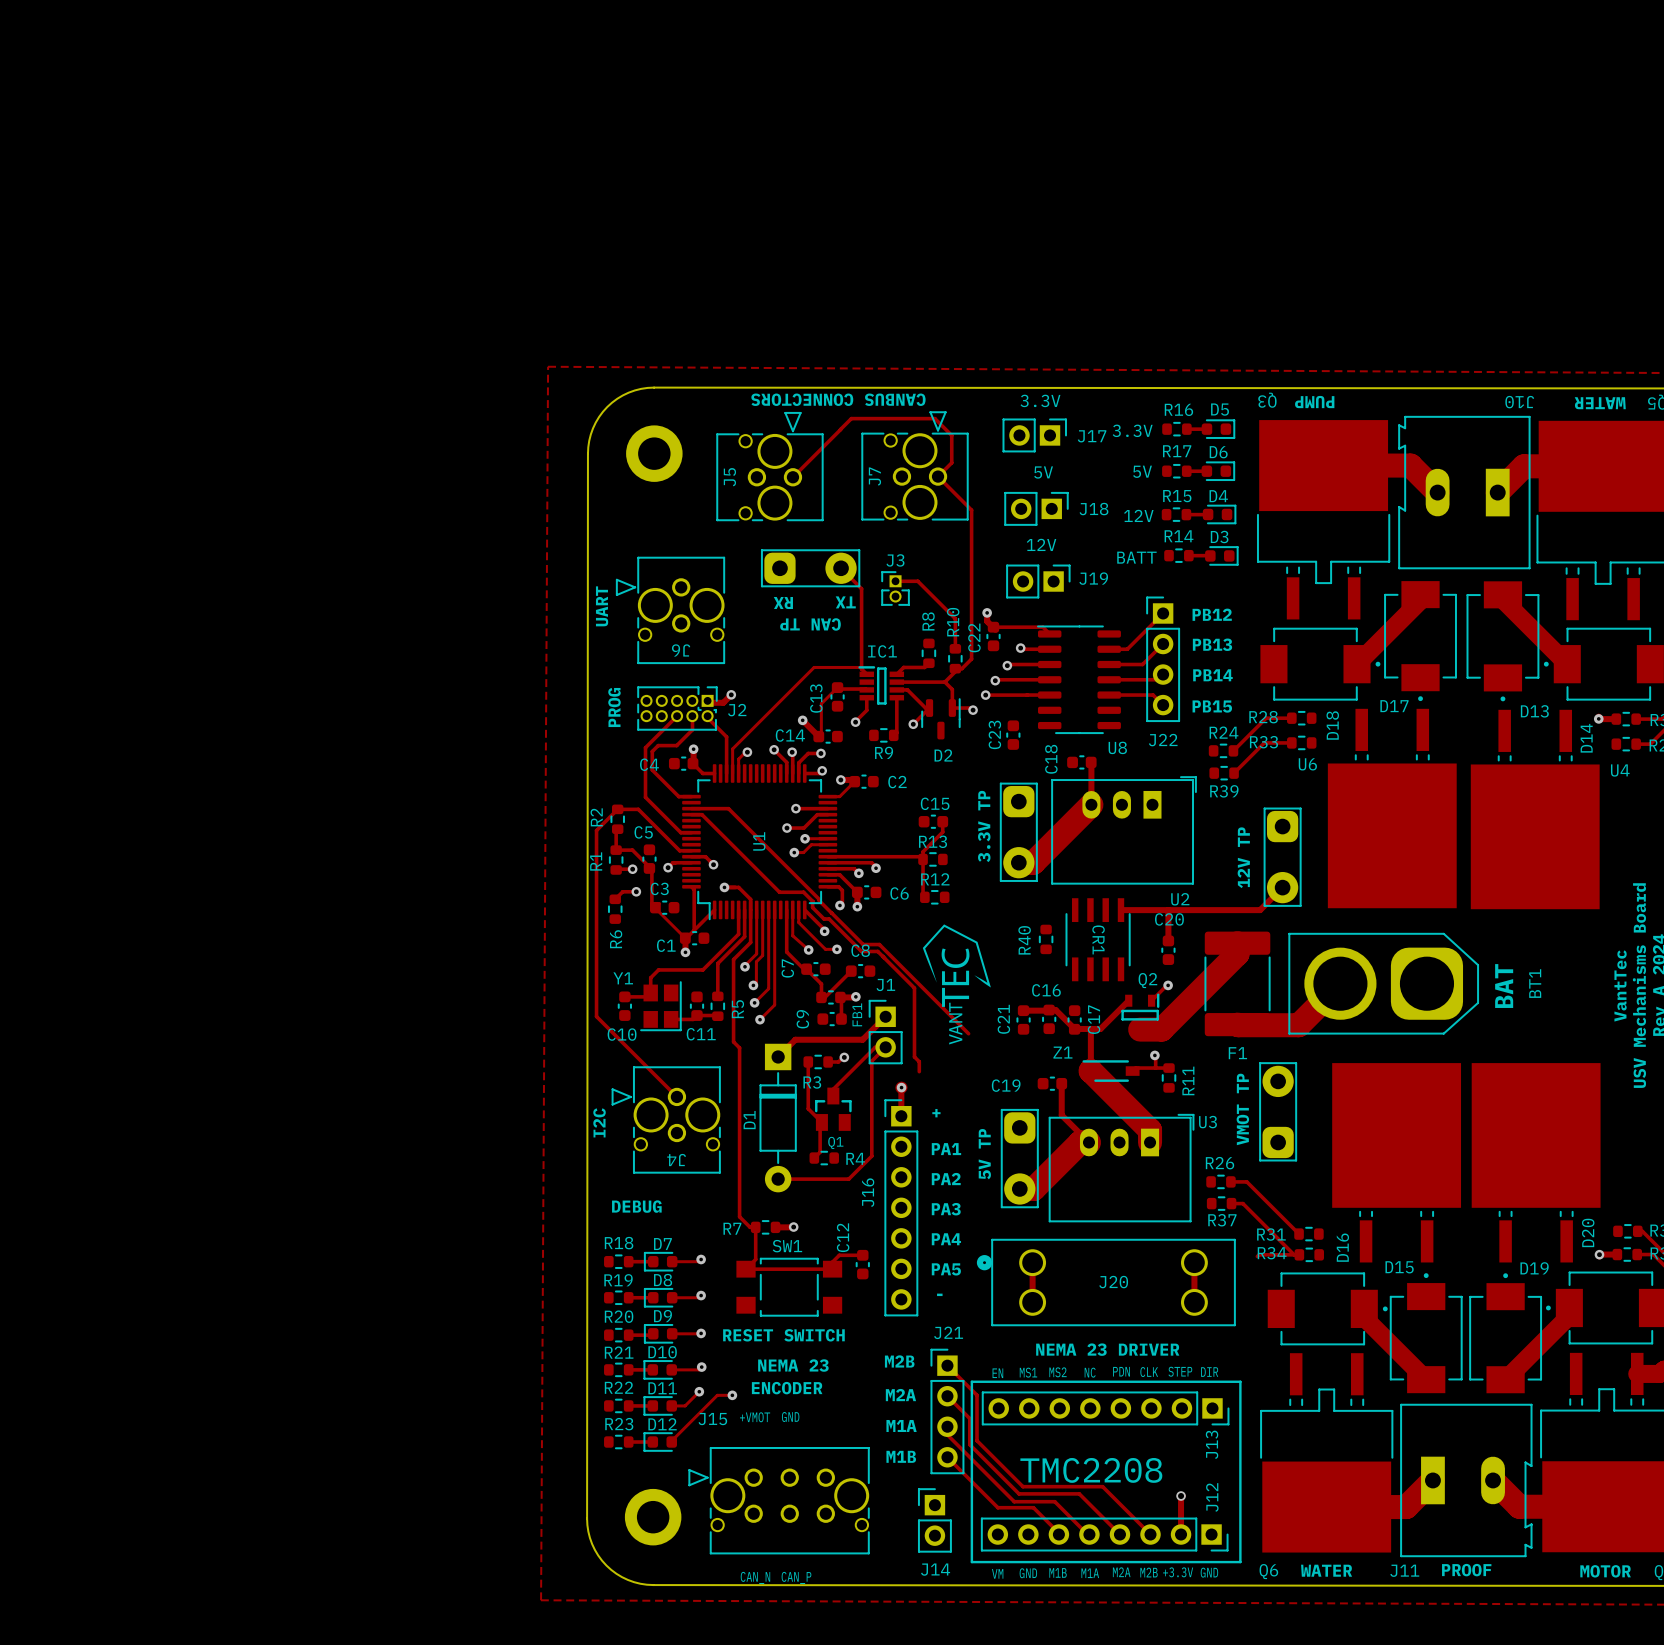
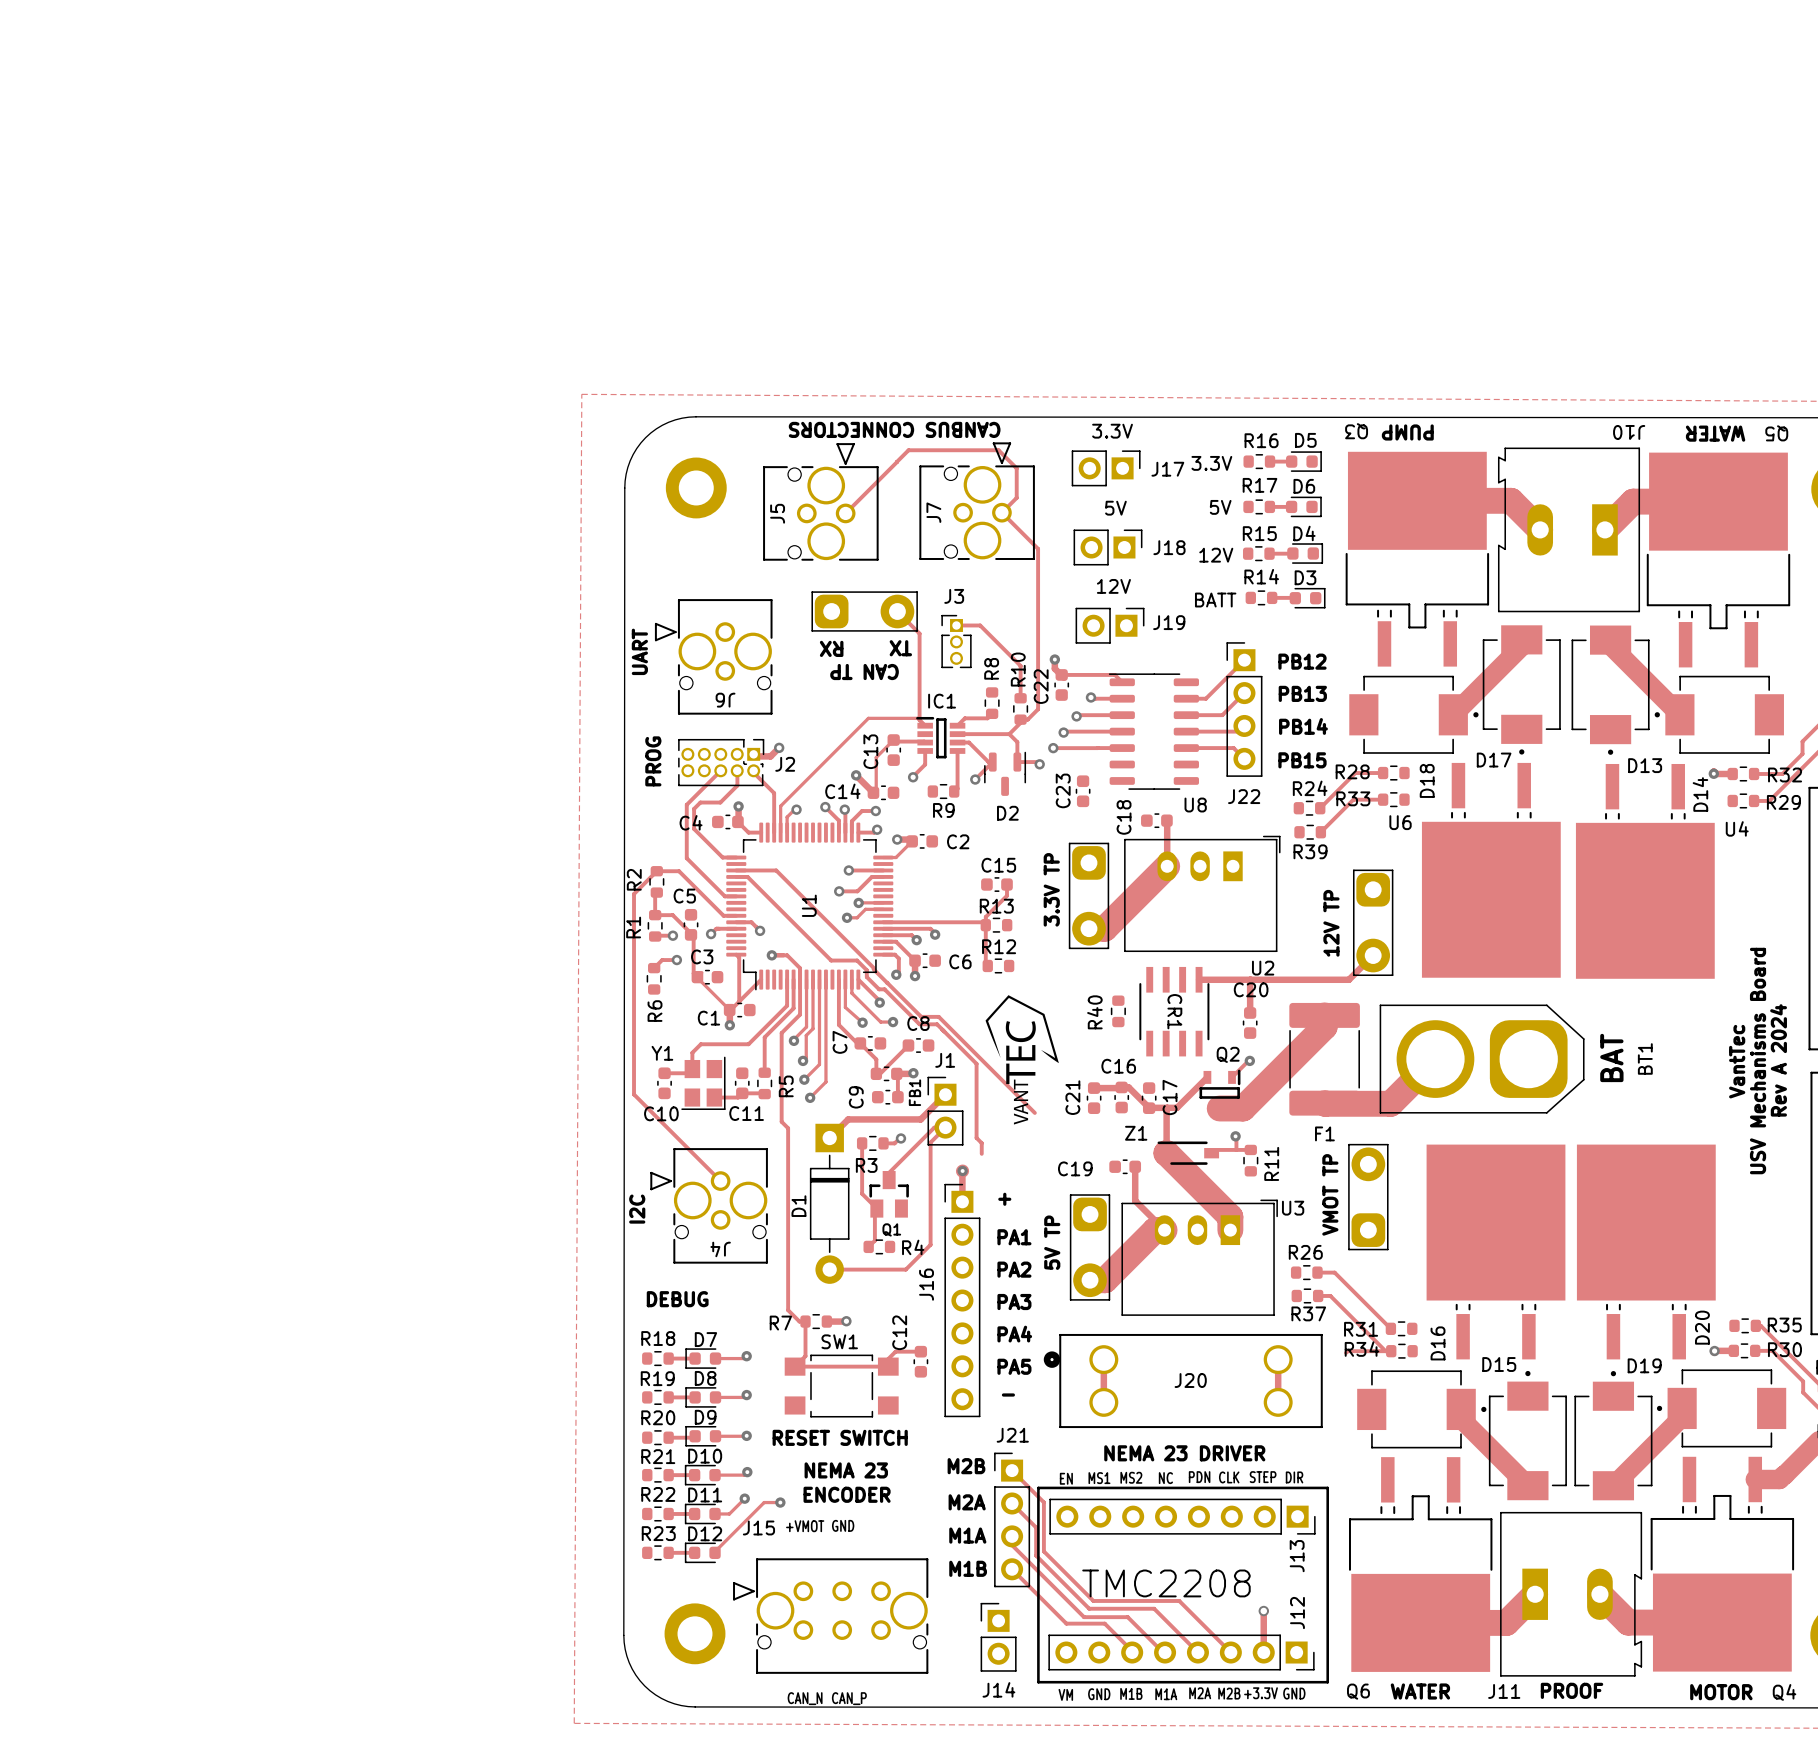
J3 footprint: [881, 571, 910, 606] -> [941, 614, 972, 669]

